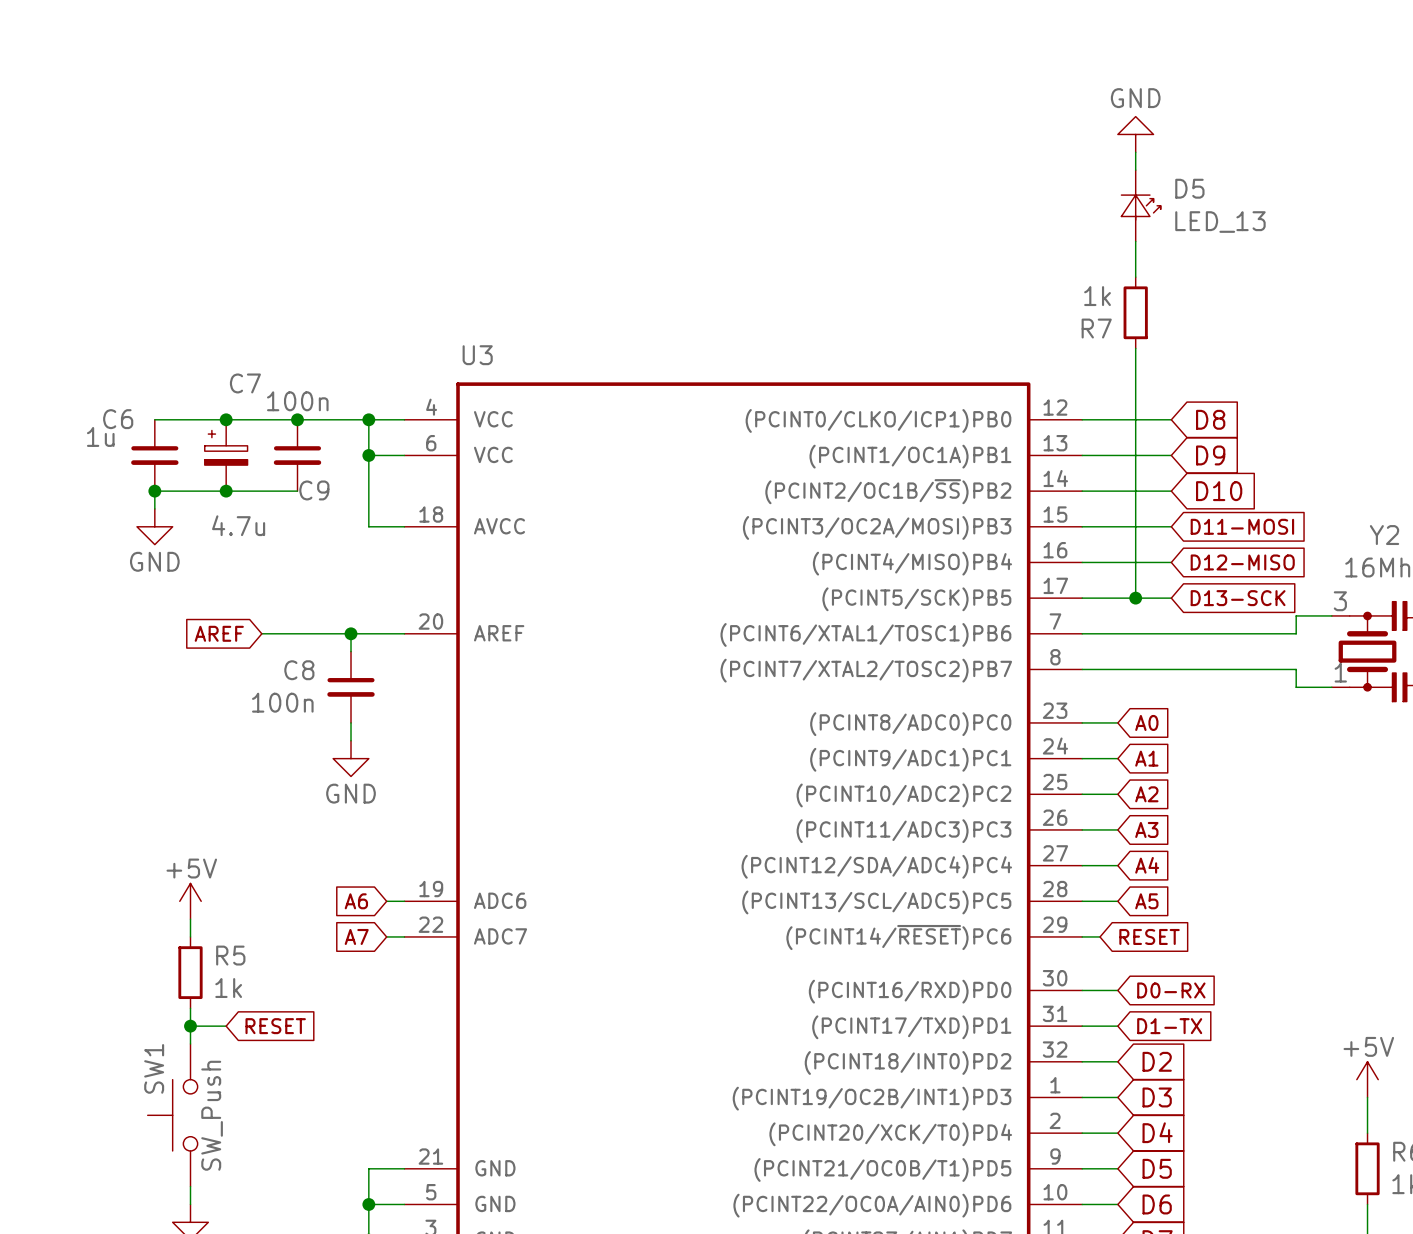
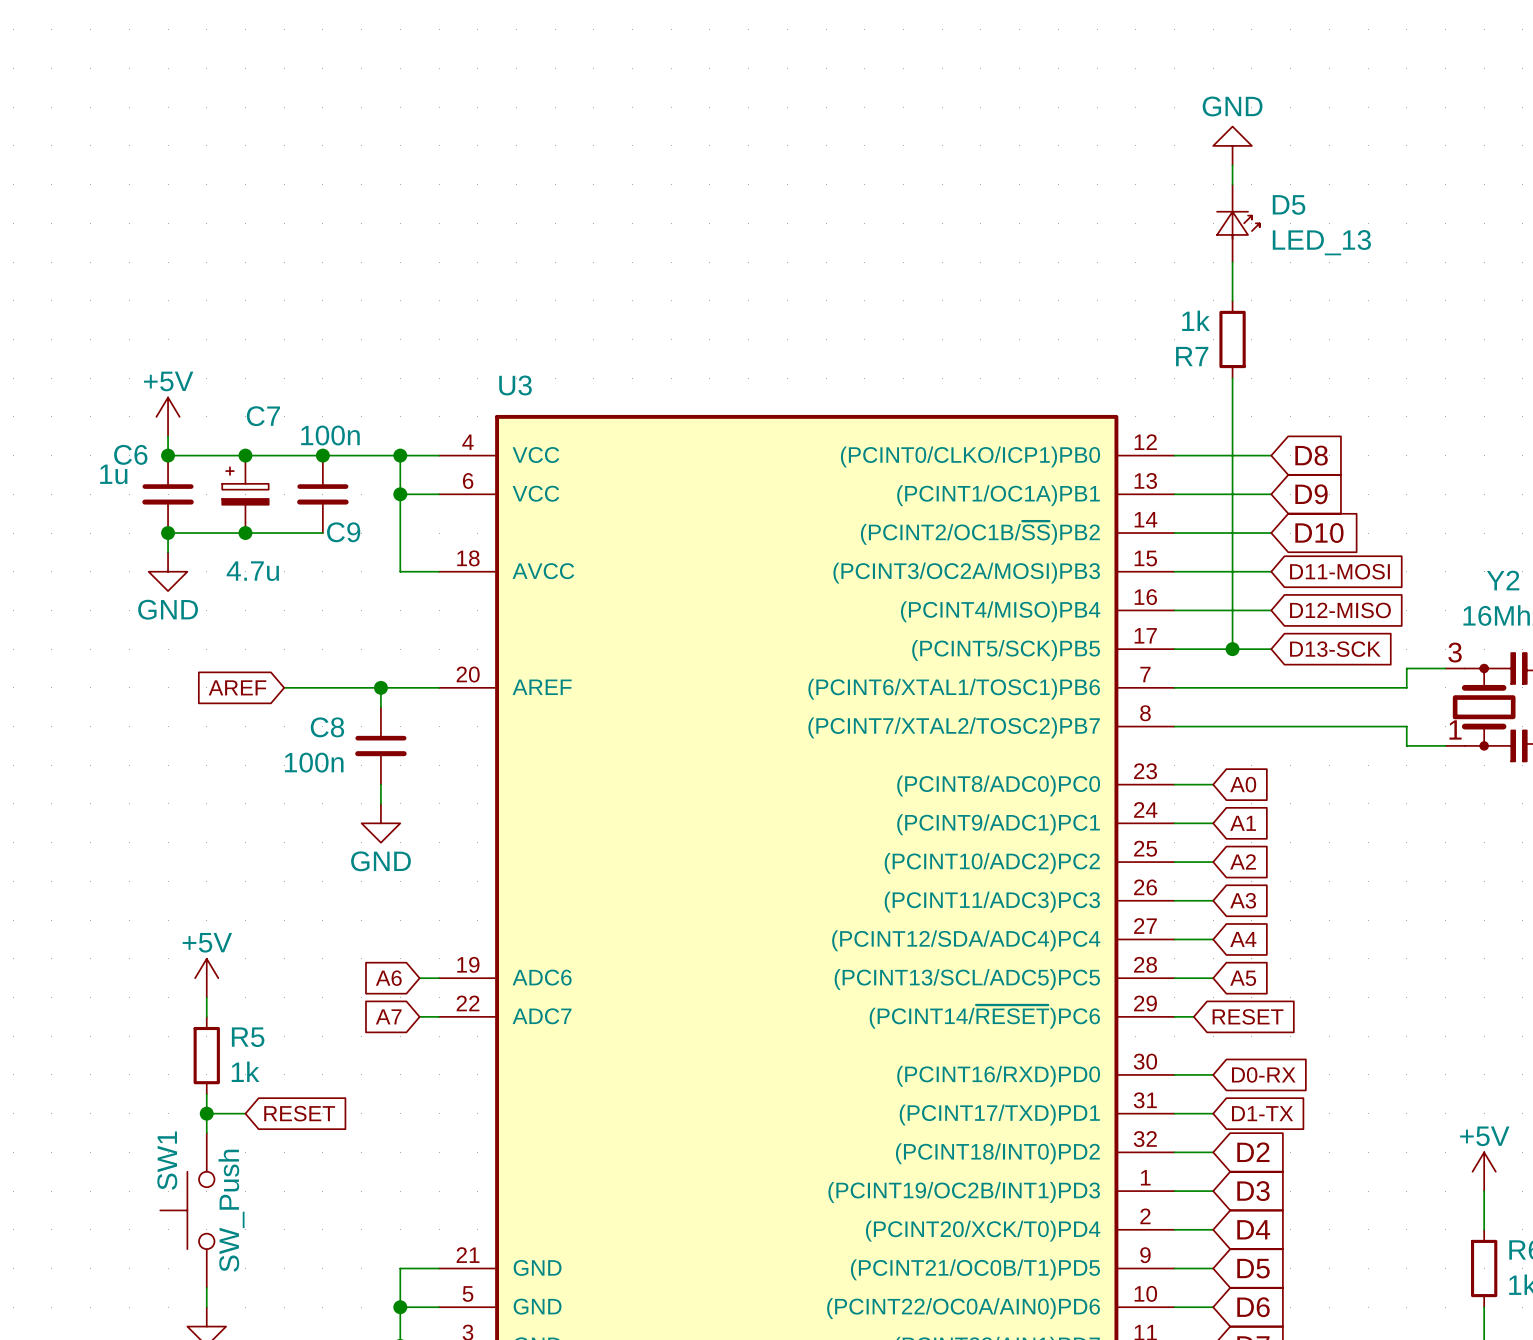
power symbol: none -> +5V (168, 416)
wire: none -> (168, 436) (168, 455)
junction: none -> (168, 455)

